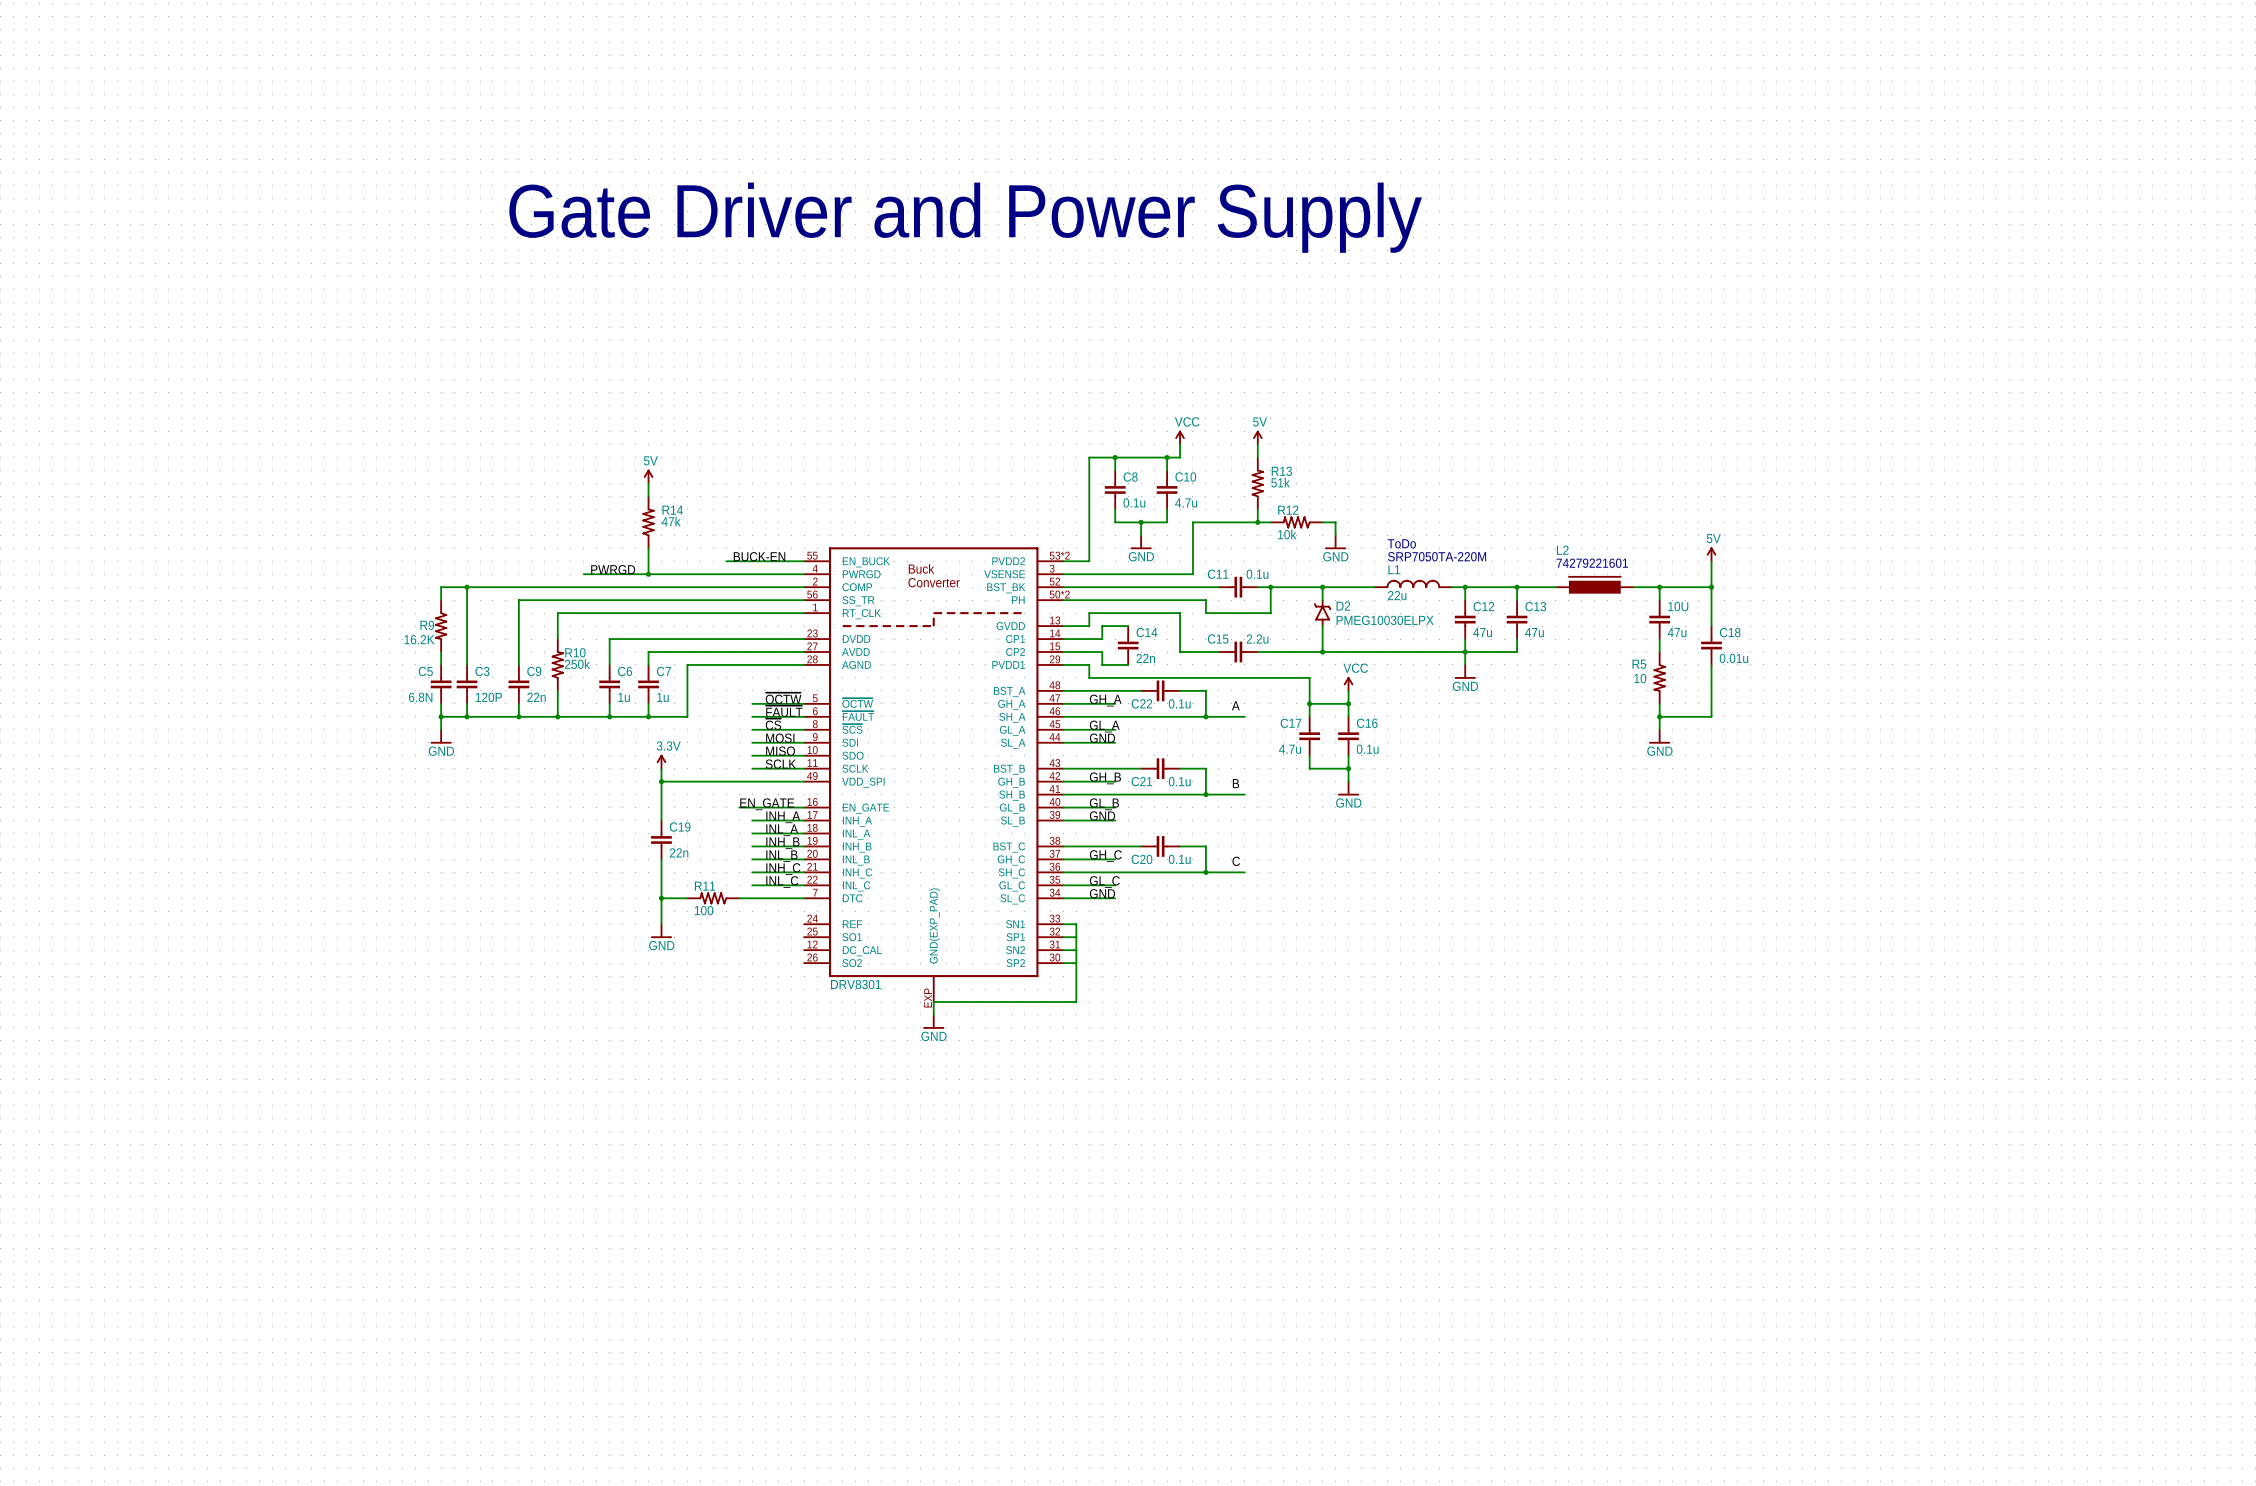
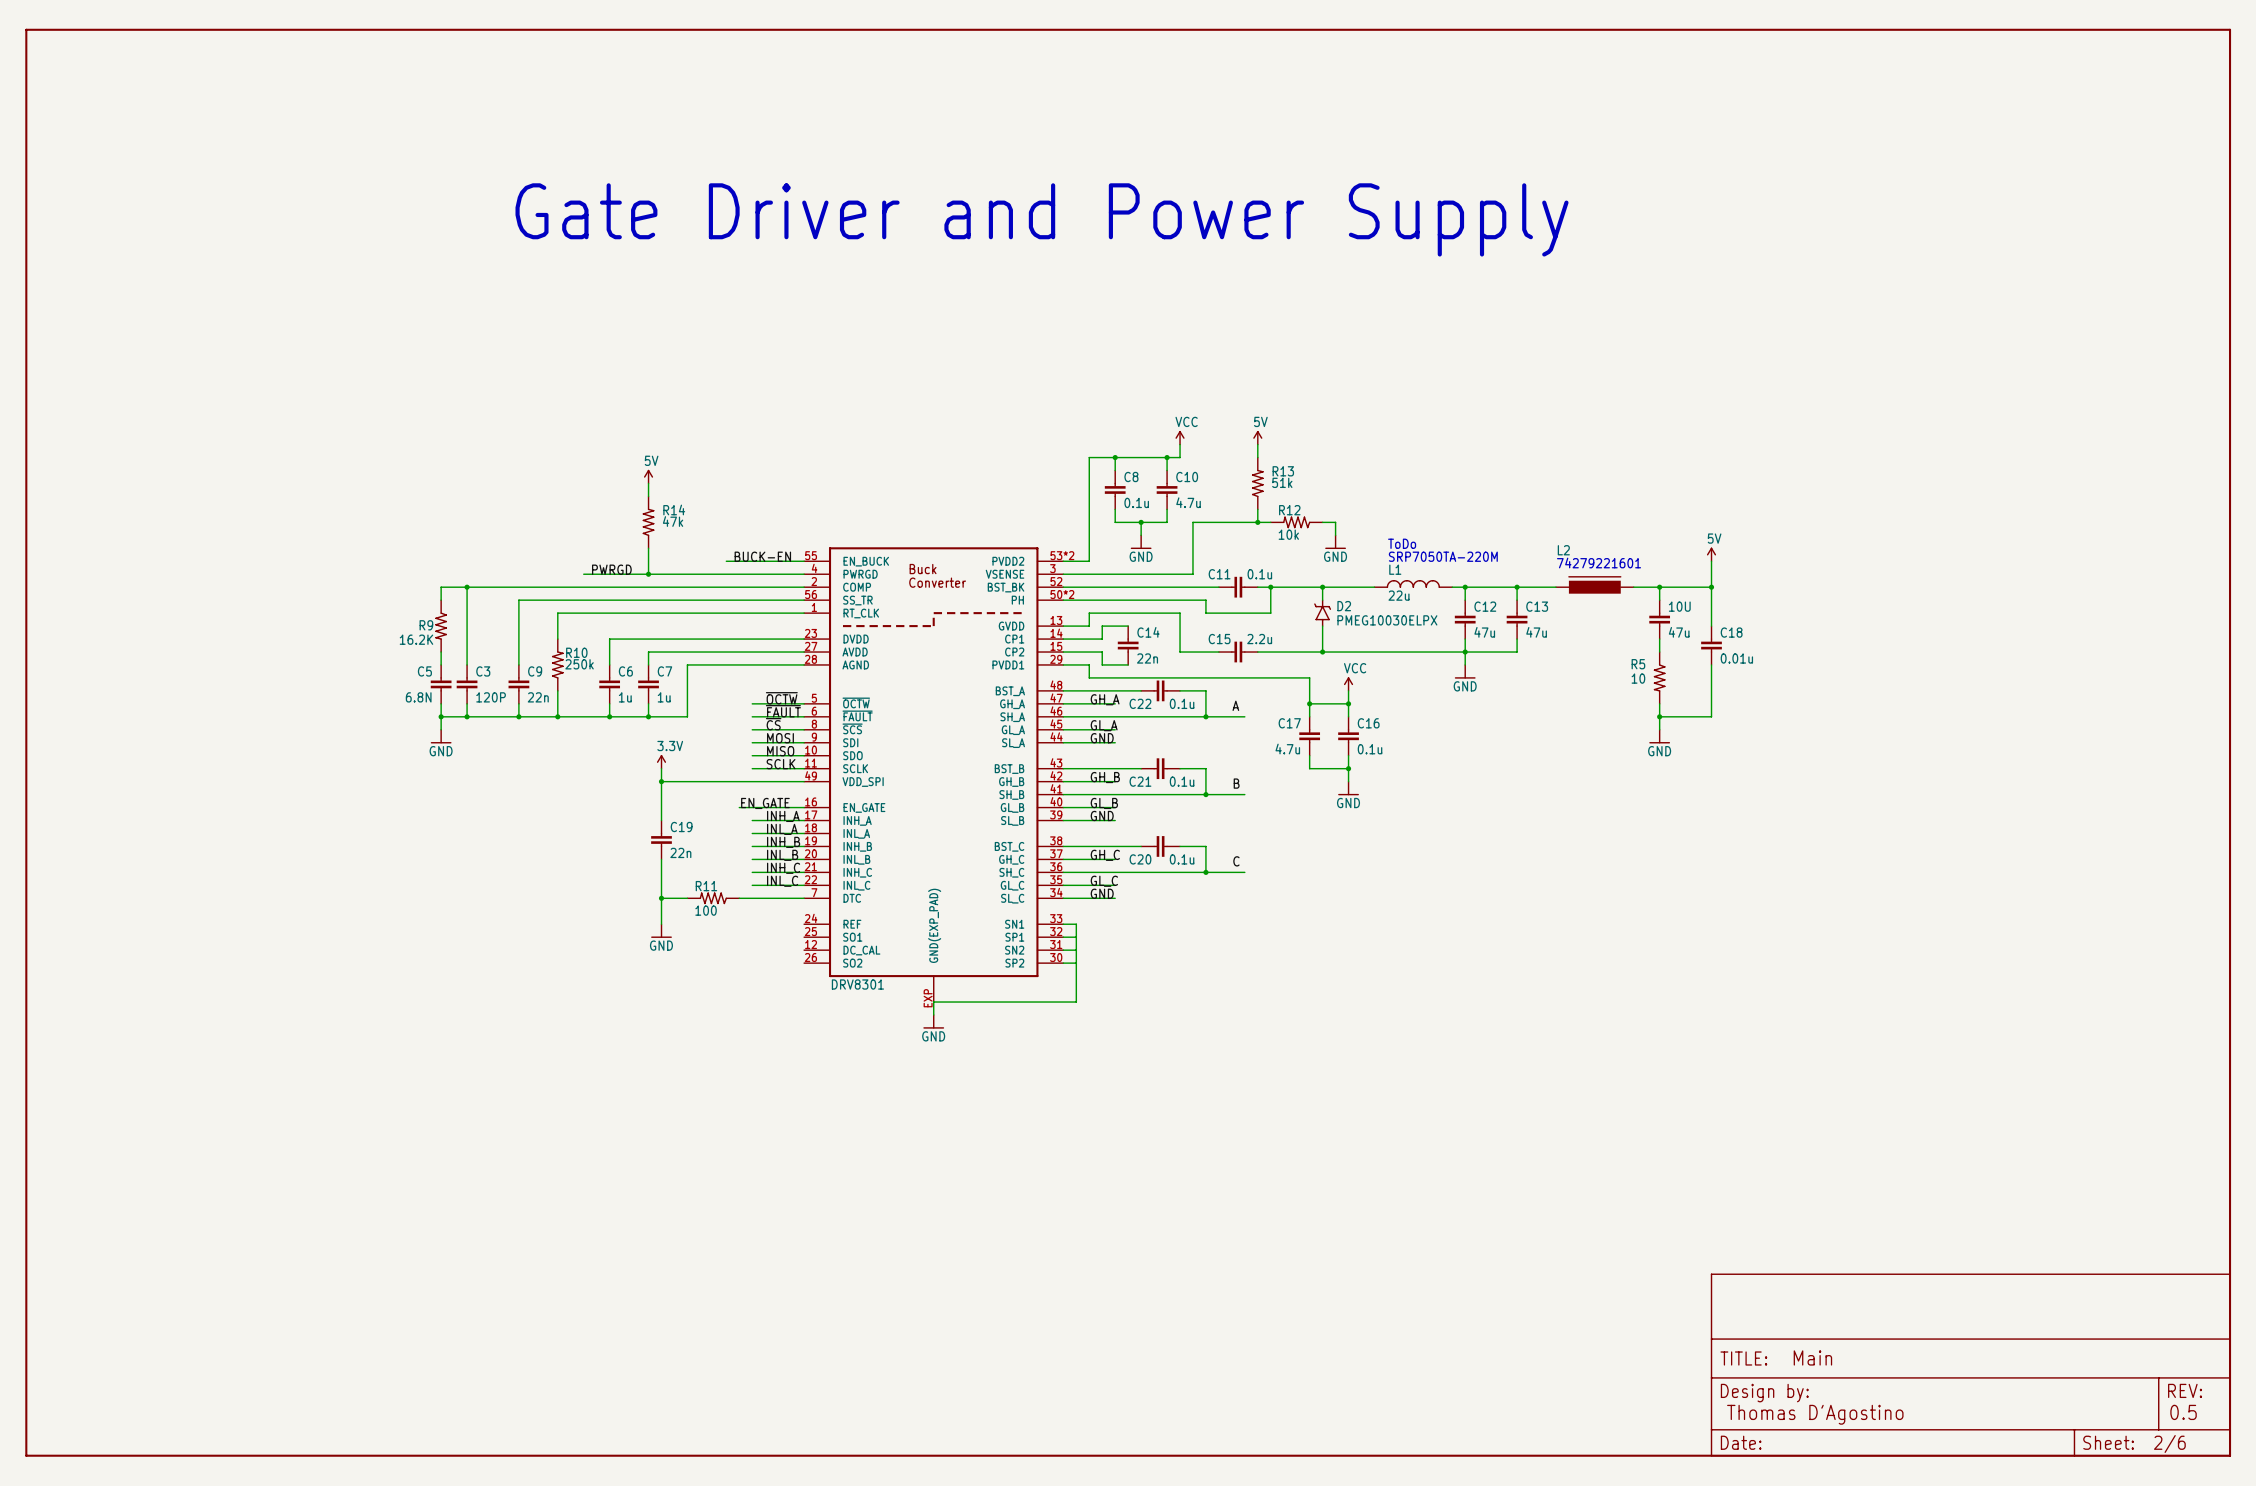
part: none -> (1128, 742)
part: none -> (1970, 1364)

